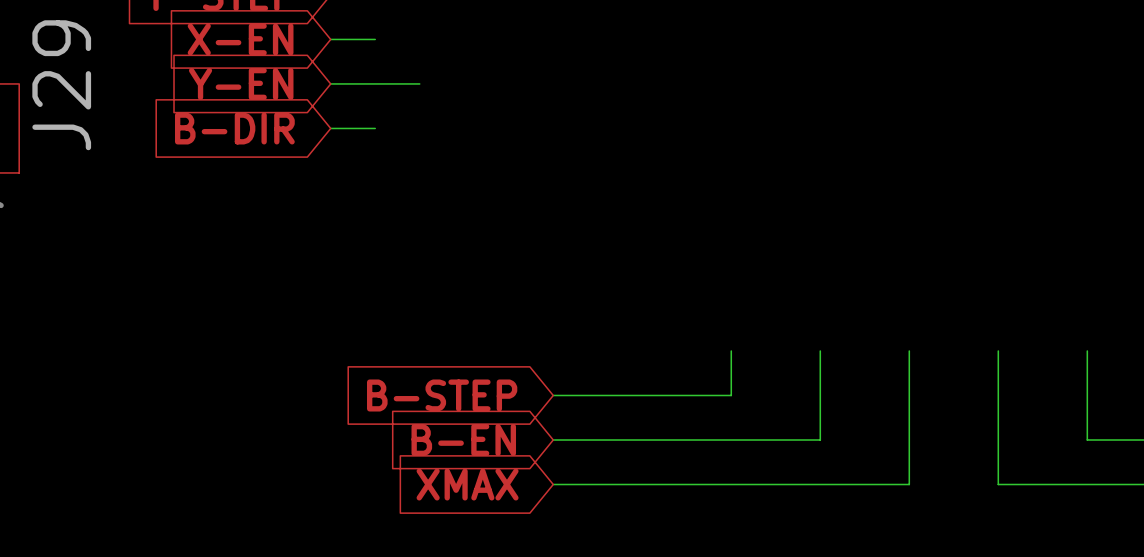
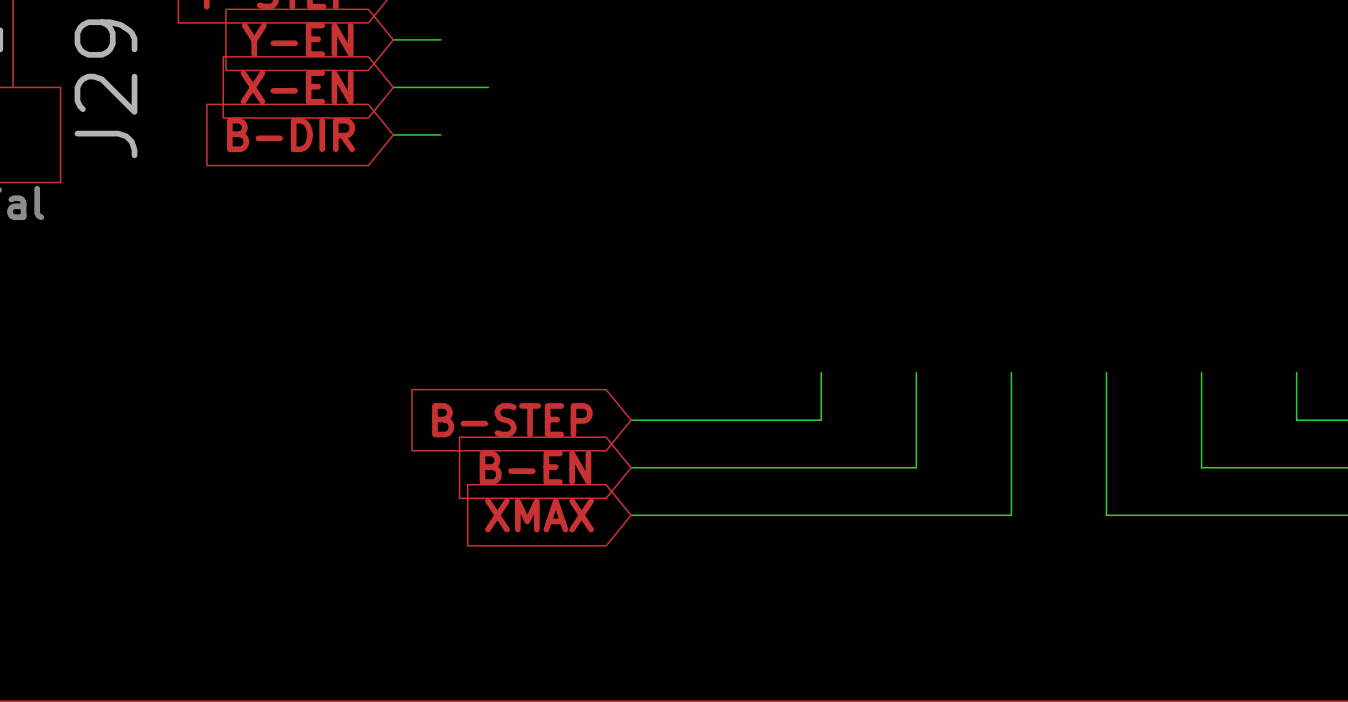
global label: X-EN (240, 39) -> Y-EN (297, 39)
global label: Y-EN (241, 83) -> X-EN (297, 87)

